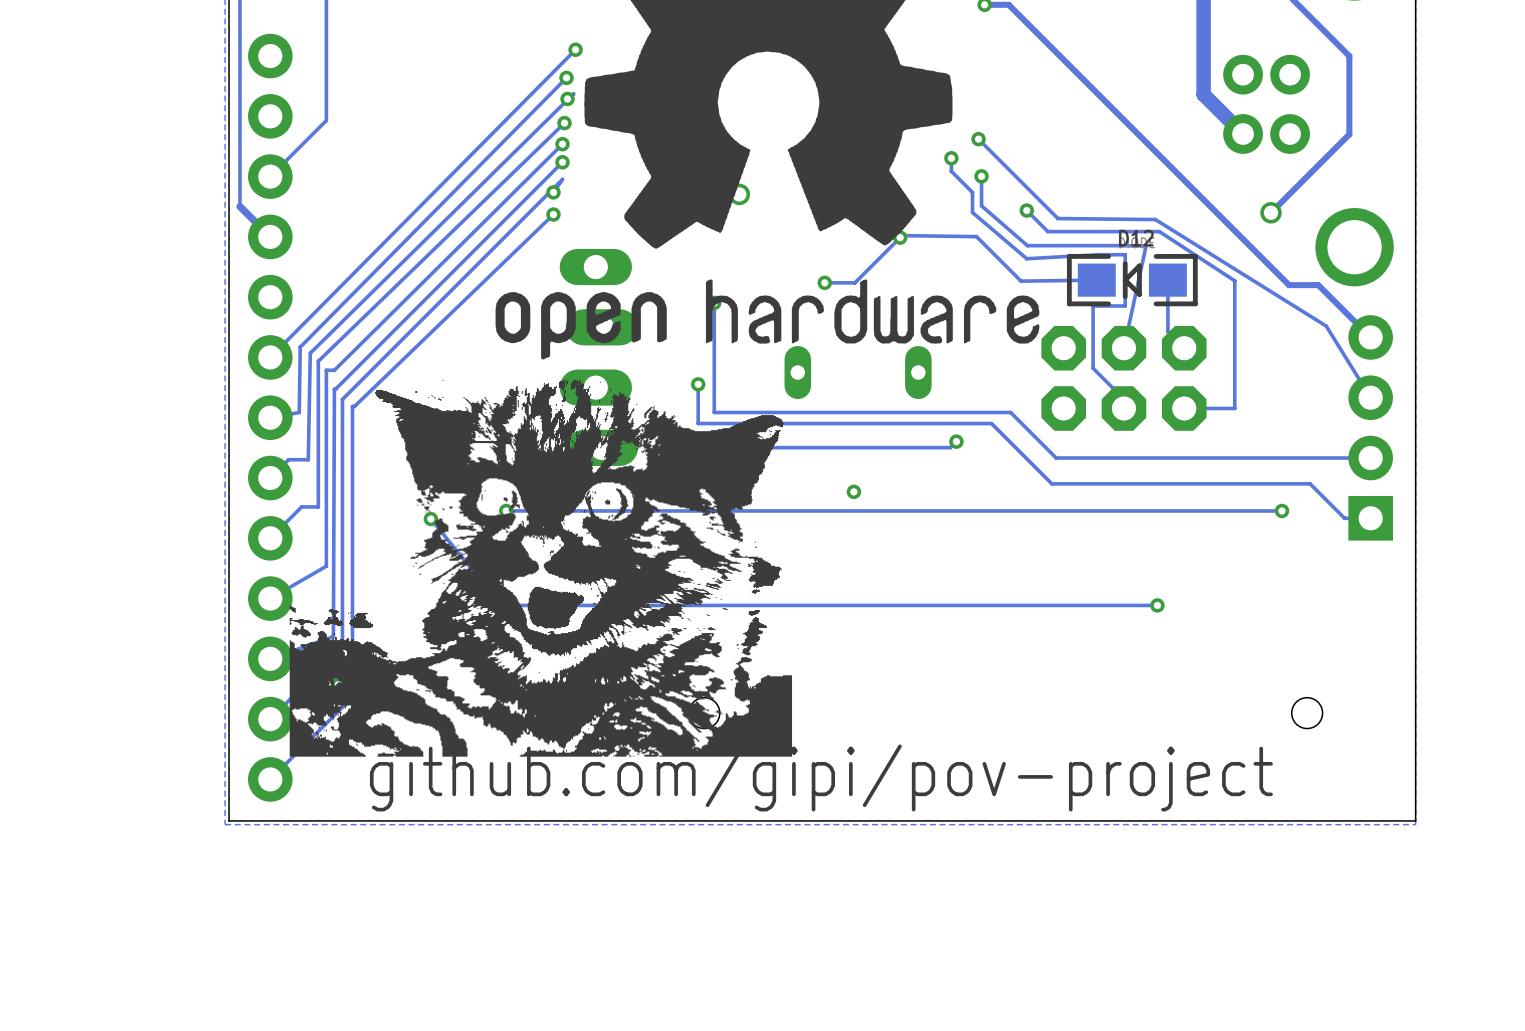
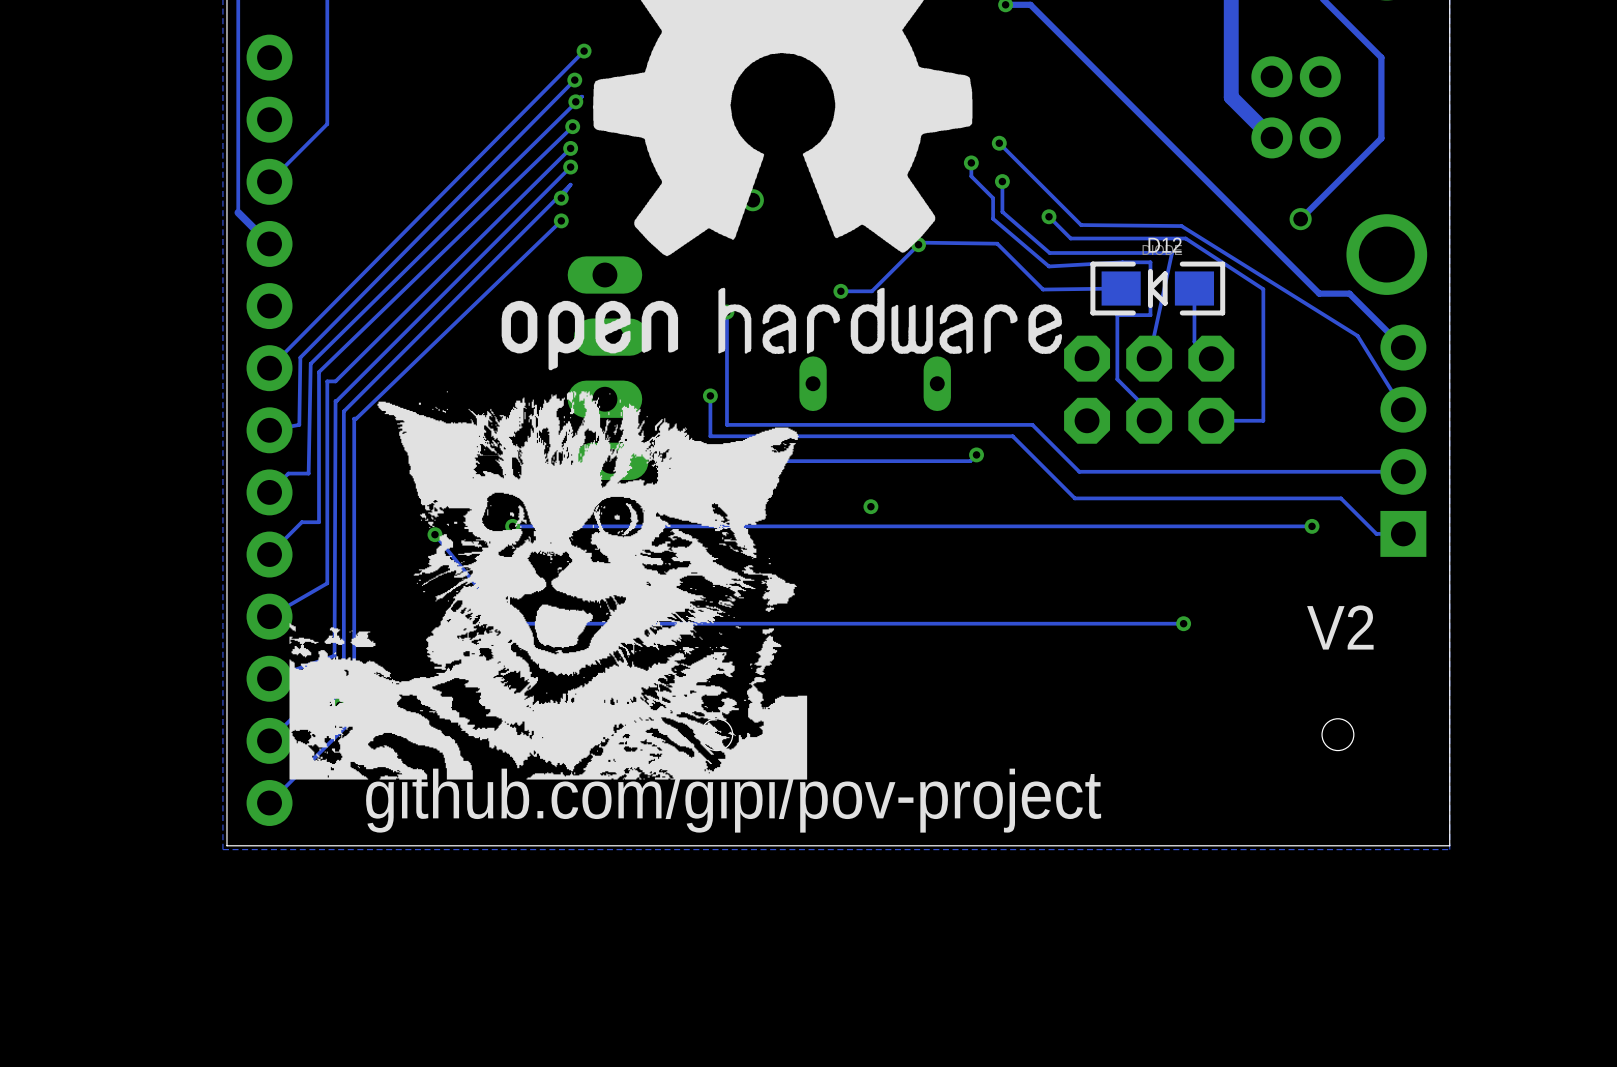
text: none -> V2 (1340, 627)

